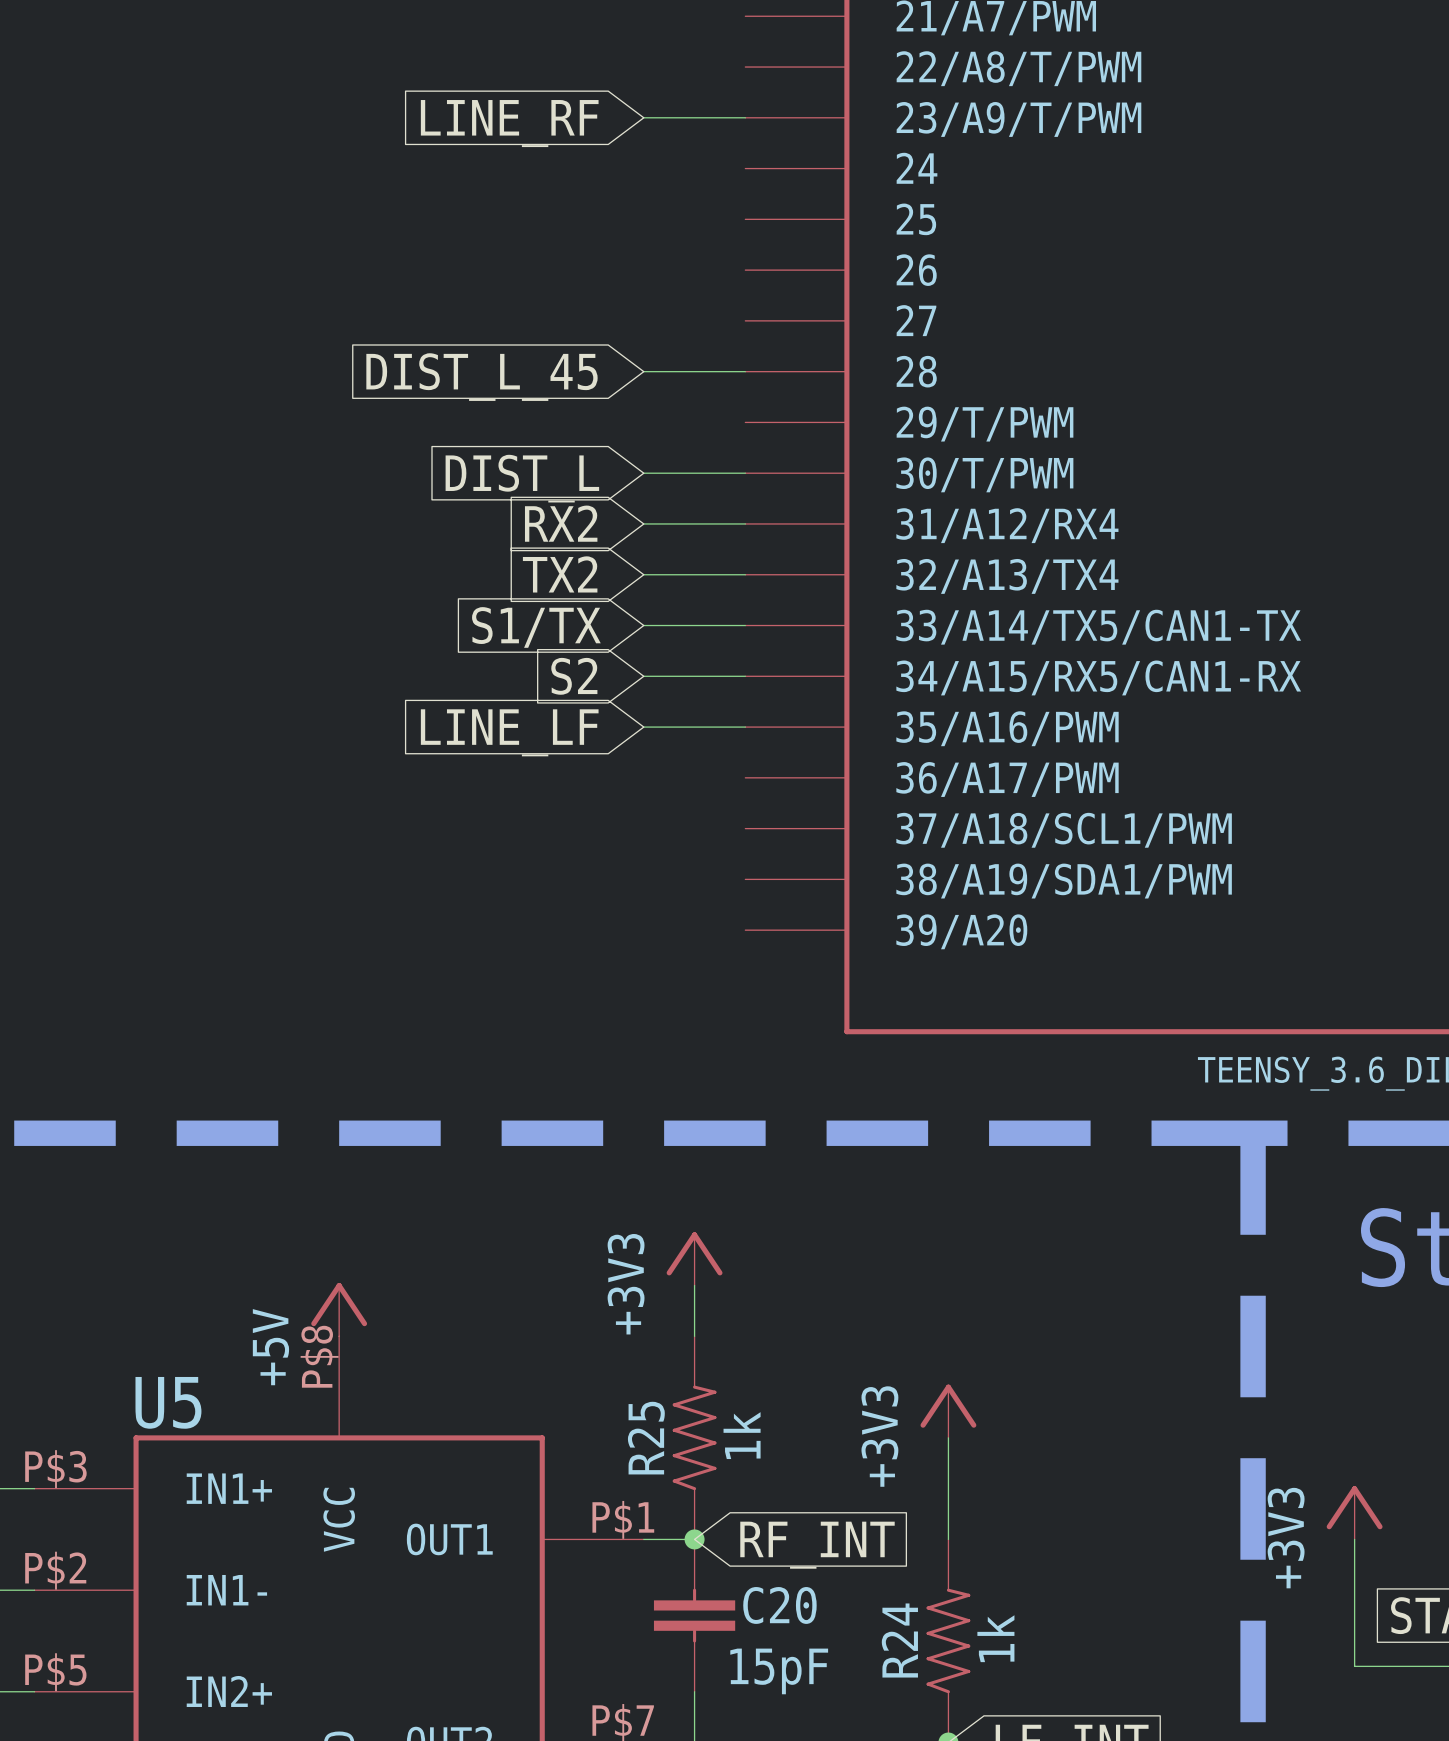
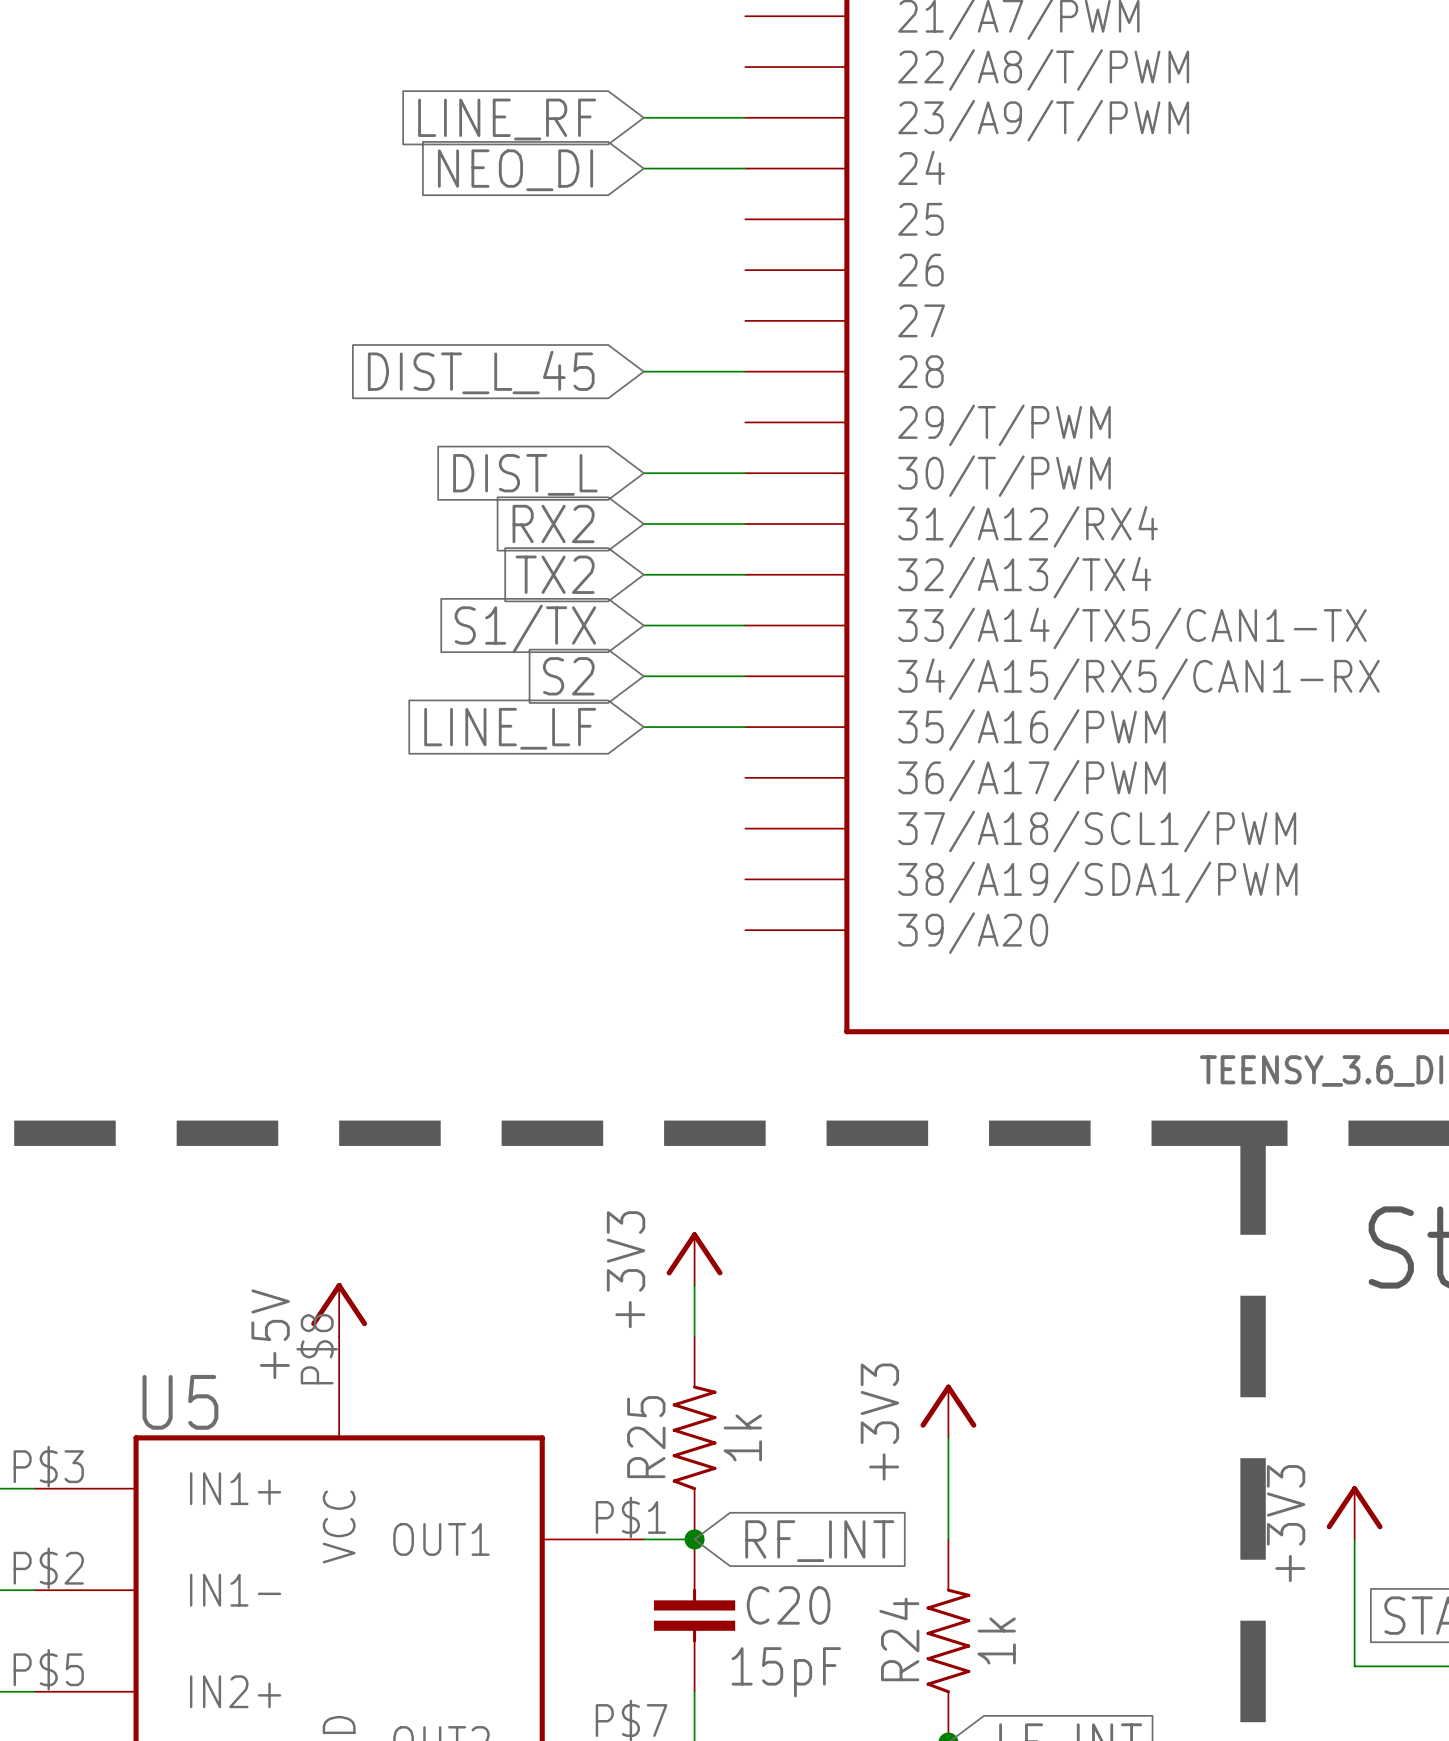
wire: none -> (643, 168) (745, 168)
global label: none -> NEO_DI (515, 170)

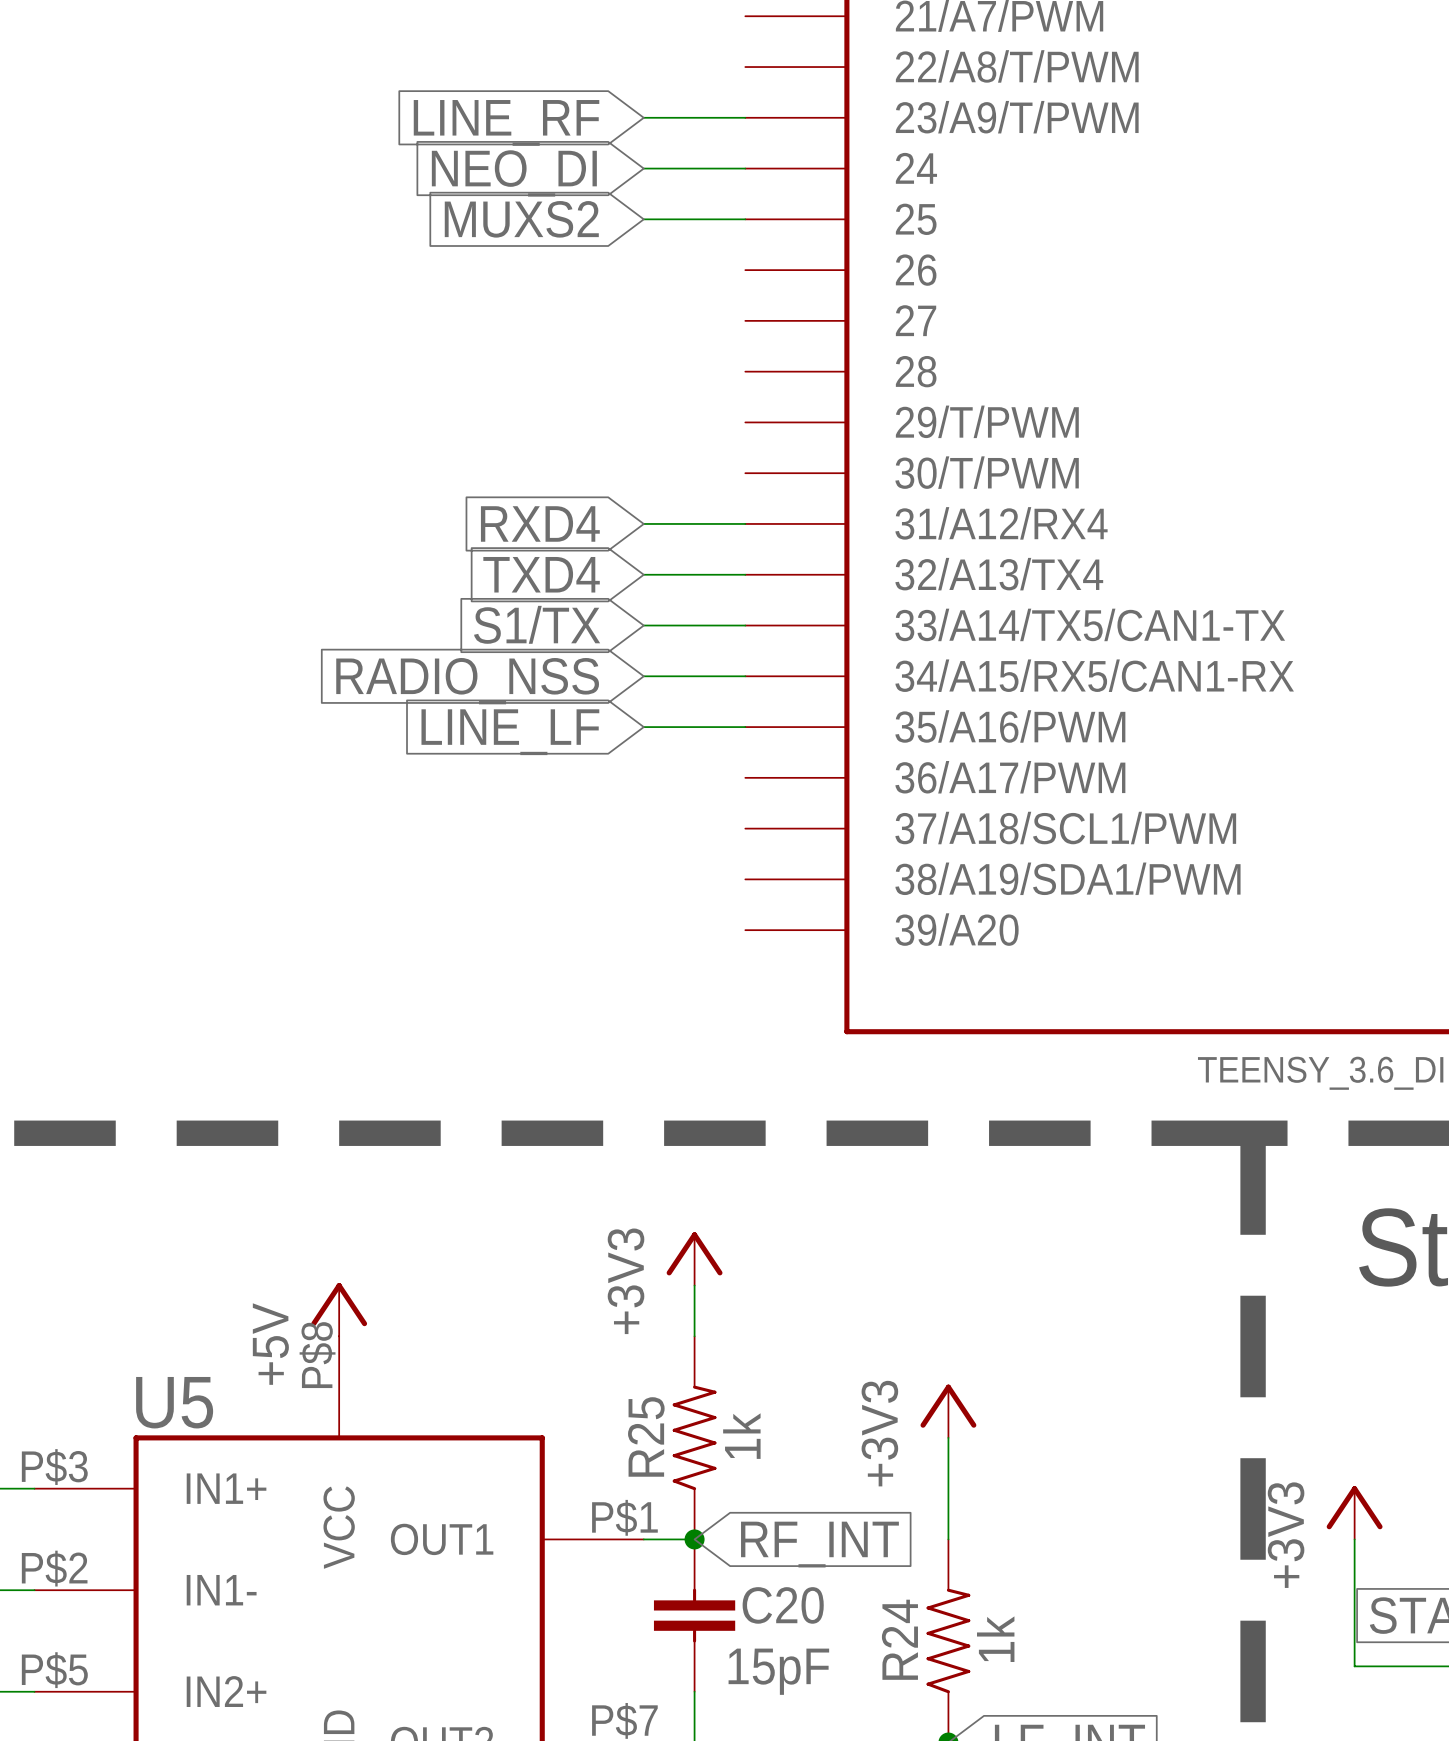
global label: none -> MUXS2 (521, 219)
wire: (643, 371) (745, 371) -> (643, 219) (745, 219)
global label: DIST_L_45 (481, 372) -> none
wire: (643, 473) (745, 473) -> none
global label: DIST_L (525, 474) -> none
global label: RX2 (553, 523) -> RXD4 (540, 523)
global label: TX2 (555, 574) -> TXD4 (541, 574)
global label: S2 (568, 676) -> RADIO_NSS (467, 681)

